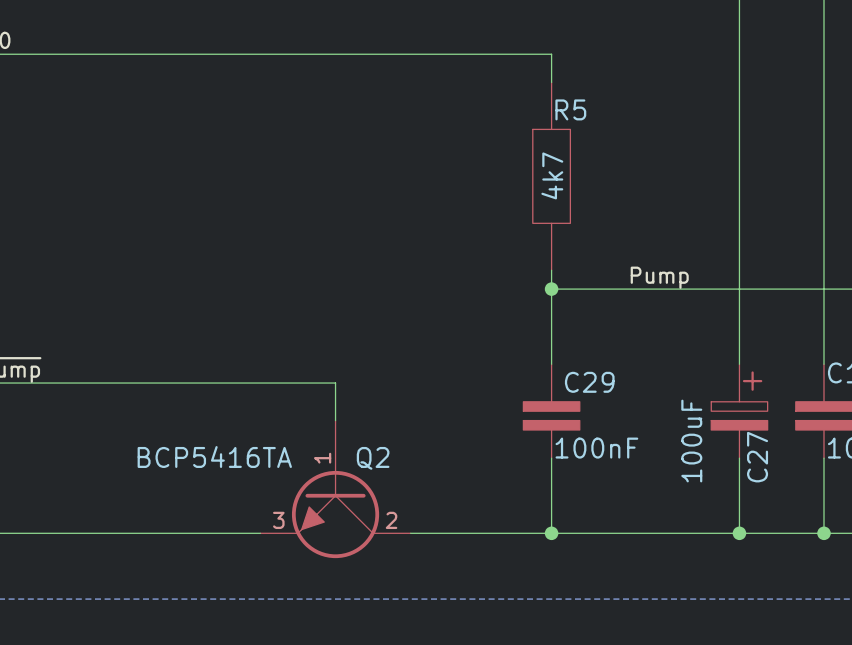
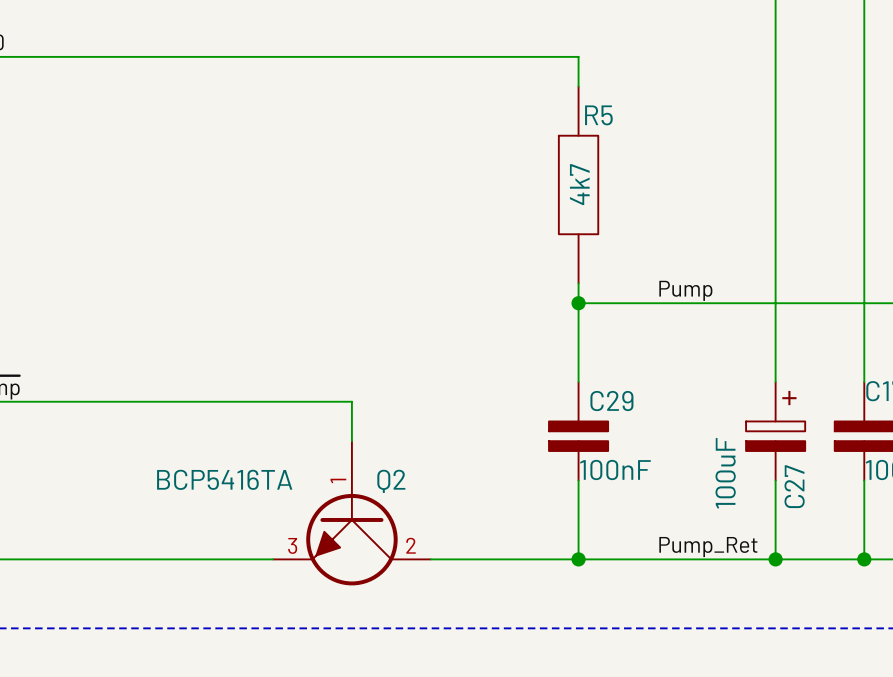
label: none -> Pump_Ret (708, 547)

